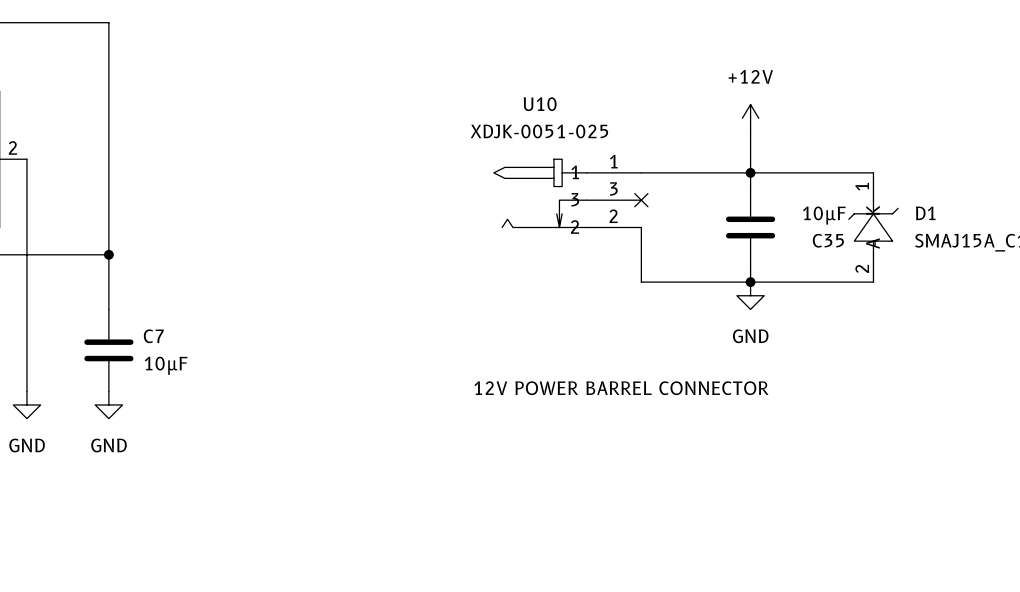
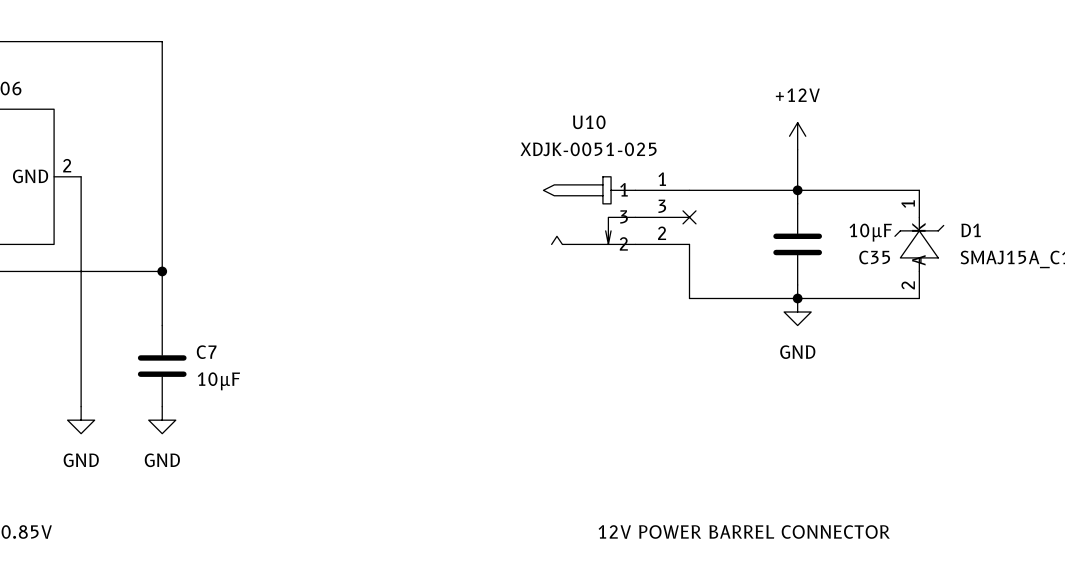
text position: 12V POWER BARREL CONNECTOR (621, 388) -> 12V POWER BARREL CONNECTOR (744, 532)

